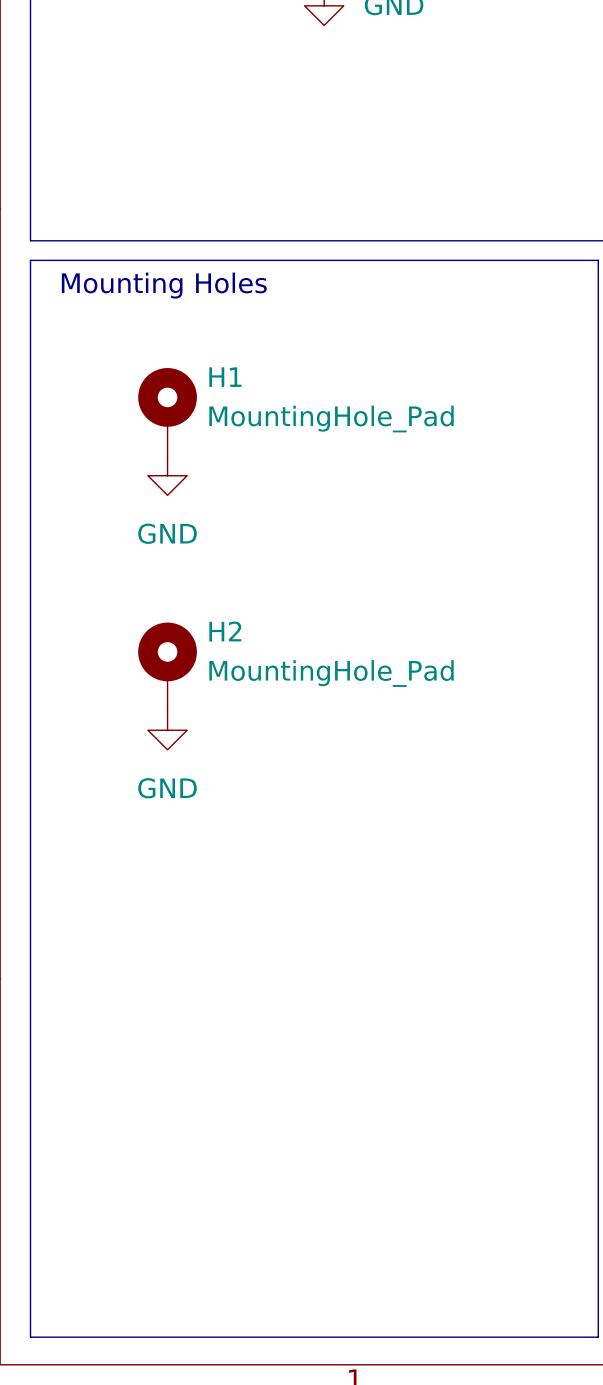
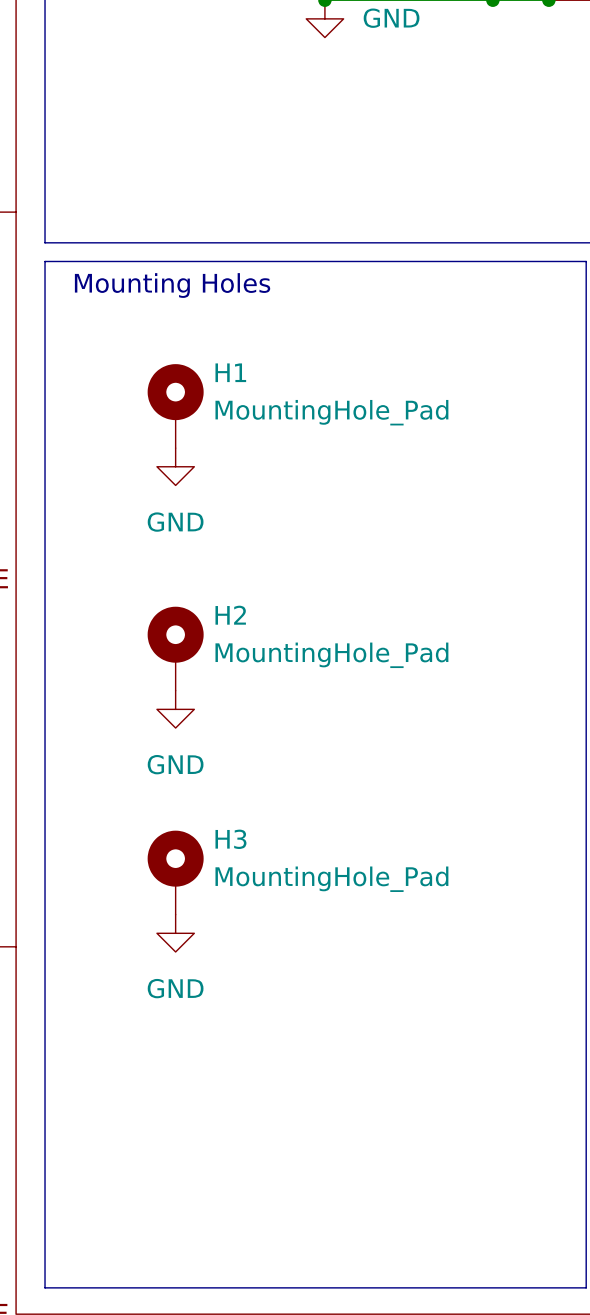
H3: none -> MountingHole_Pad (175, 872)
power symbol: none -> GND (175, 933)

